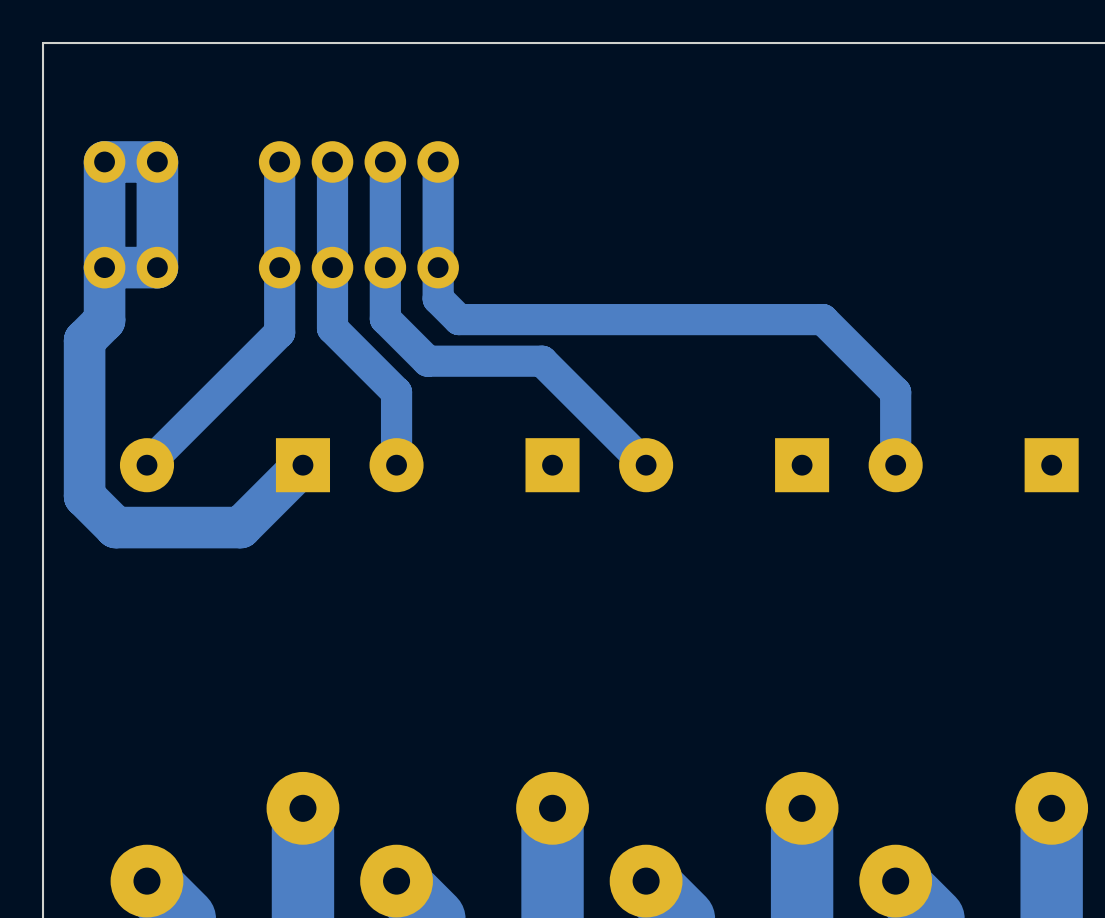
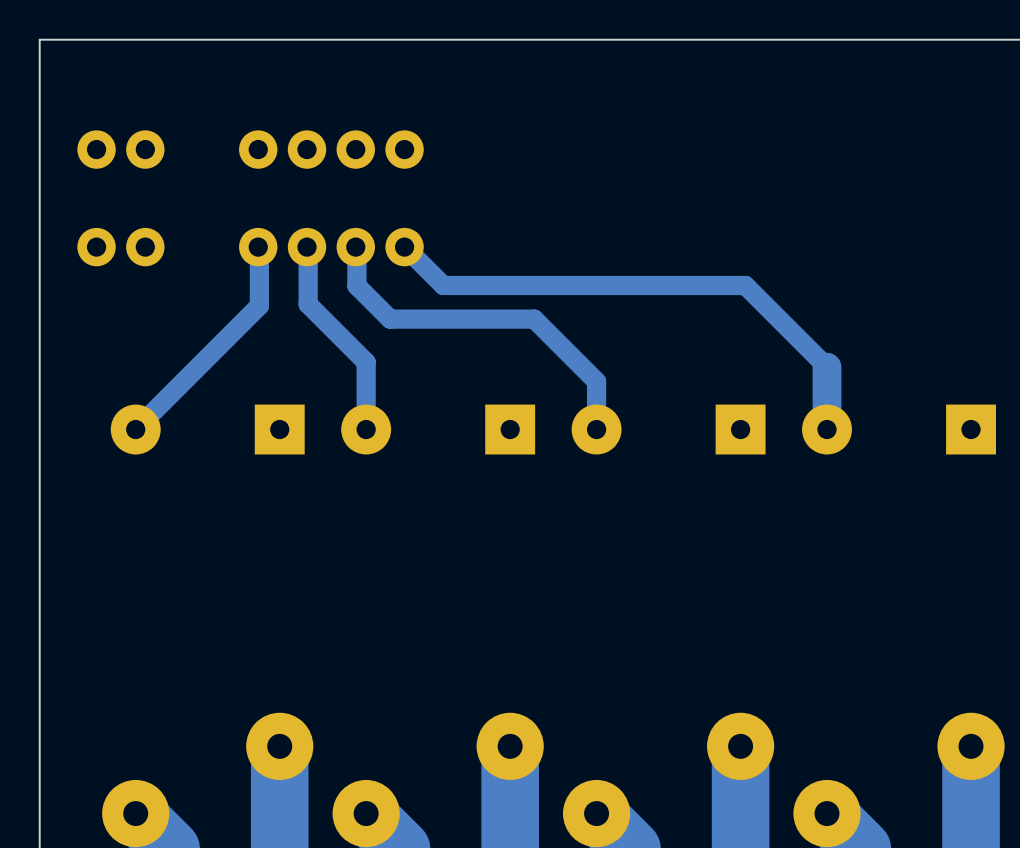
track: (279, 161) (279, 332) -> (259, 247) (258, 307)
track: (332, 161) (333, 329) -> (308, 247) (308, 304)
track: (385, 161) (385, 318) (427, 361) (542, 361) (646, 465) -> (356, 247) (356, 285) (390, 319) (534, 319) (596, 381) (596, 429)
track: (438, 161) (438, 298) (458, 319) (822, 319) (895, 392) (895, 397) -> (405, 247) (443, 285) (745, 285) (827, 367)
track: (104, 267) (157, 267) (157, 161) (104, 161) (104, 320) (84, 340) (84, 496) (115, 527) (240, 527) (302, 465) -> none
track width: thick (333, 329) (396, 392) (396, 465) -> thin (308, 304) (366, 362) (366, 429)
track width: thick (279, 332) (146, 465) -> thin (258, 307) (135, 429)

